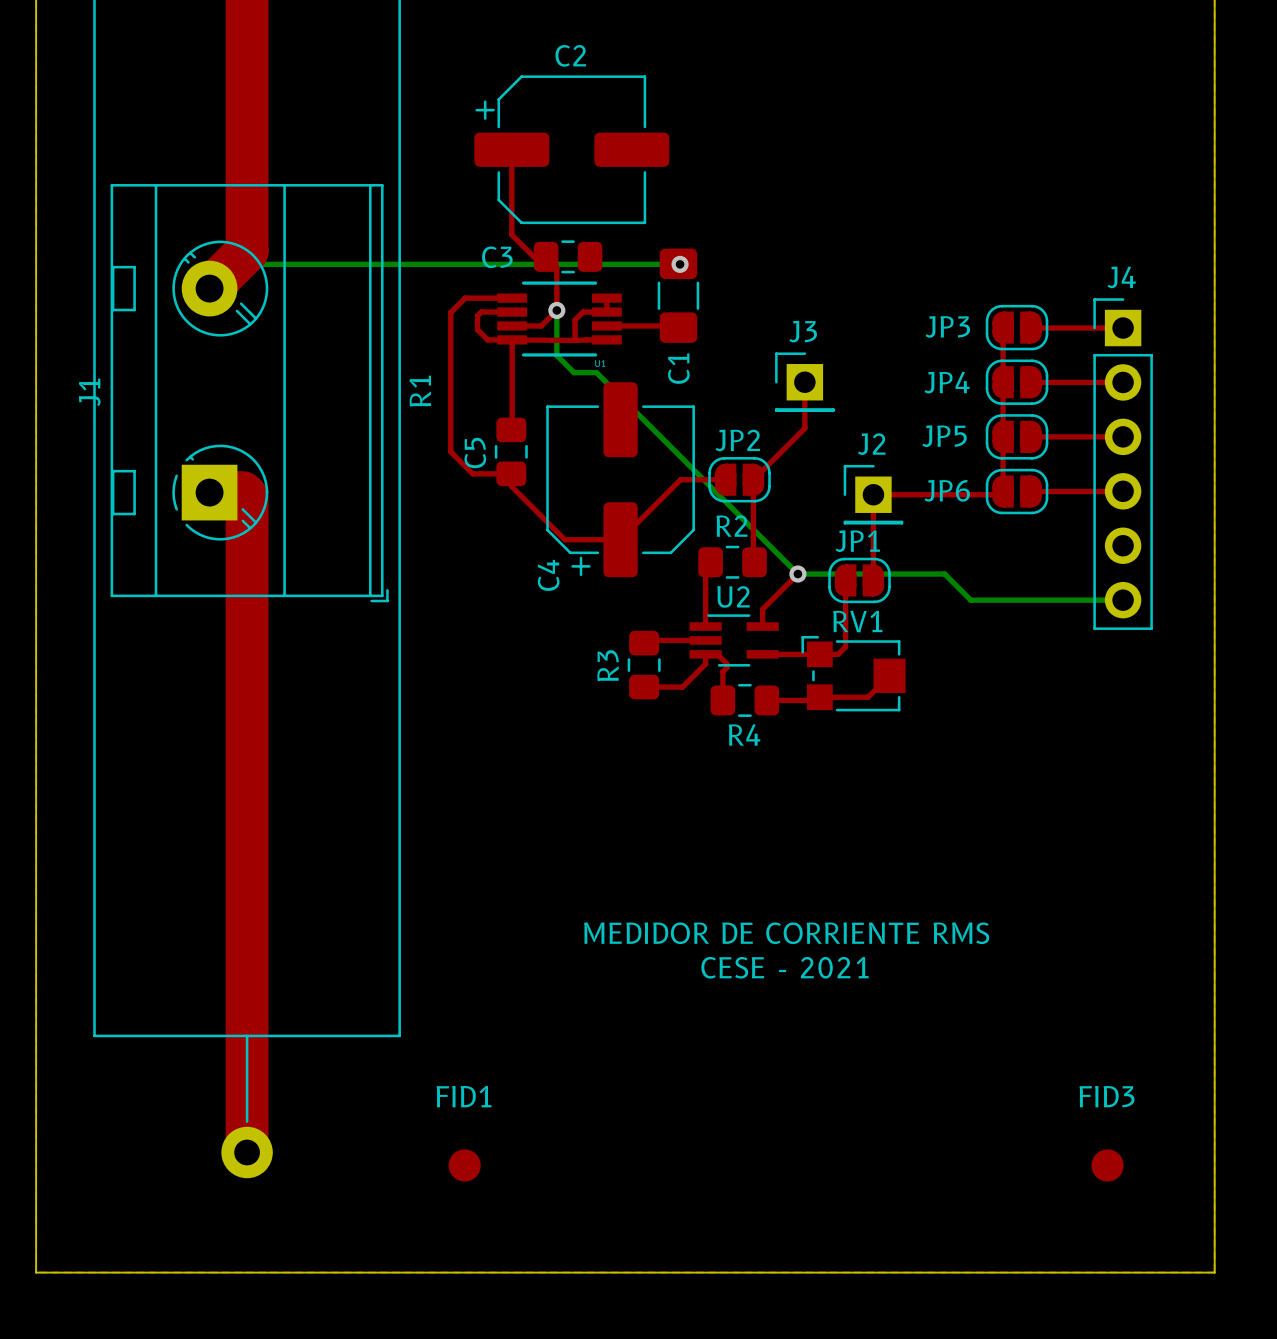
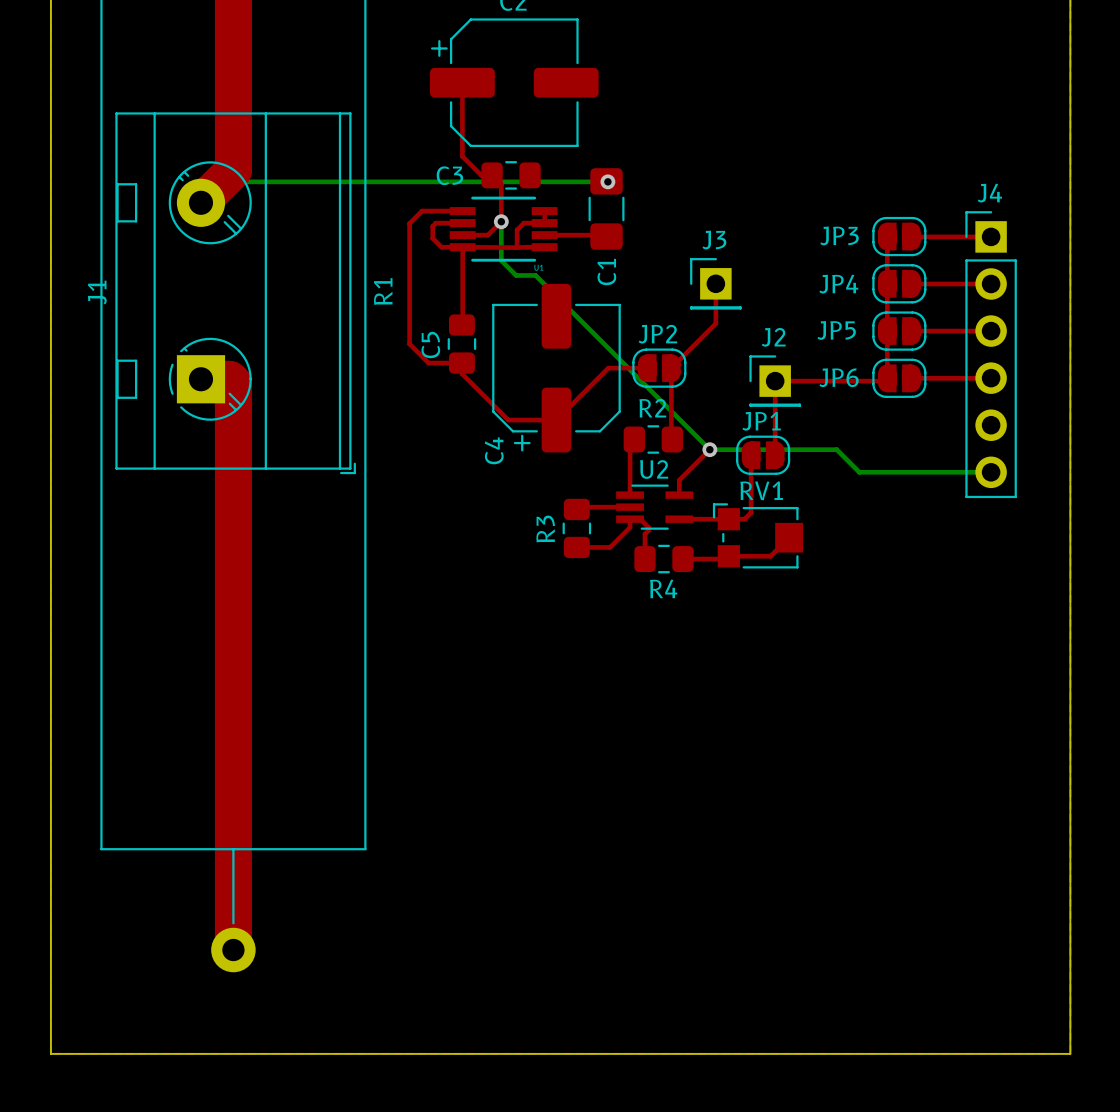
text: MEDIDOR DE CORRIENTE RMS (786, 933) -> none
text: CESE - 2021 (784, 967) -> none
FID1: (464, 1165) -> none
FID3: (1107, 1165) -> none

